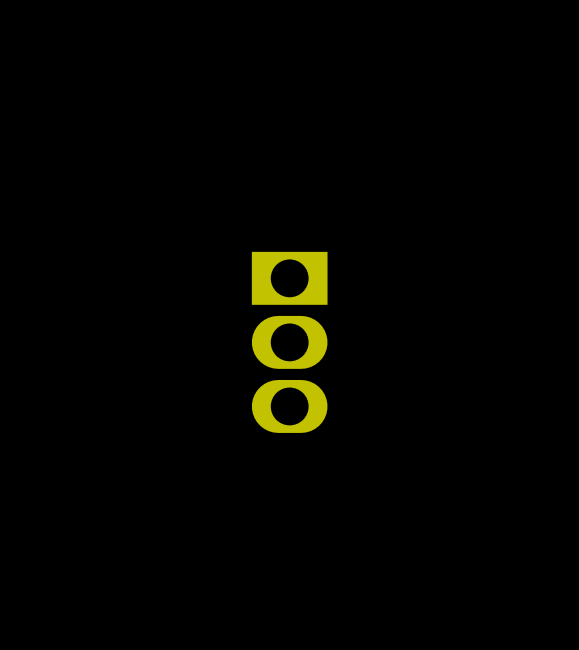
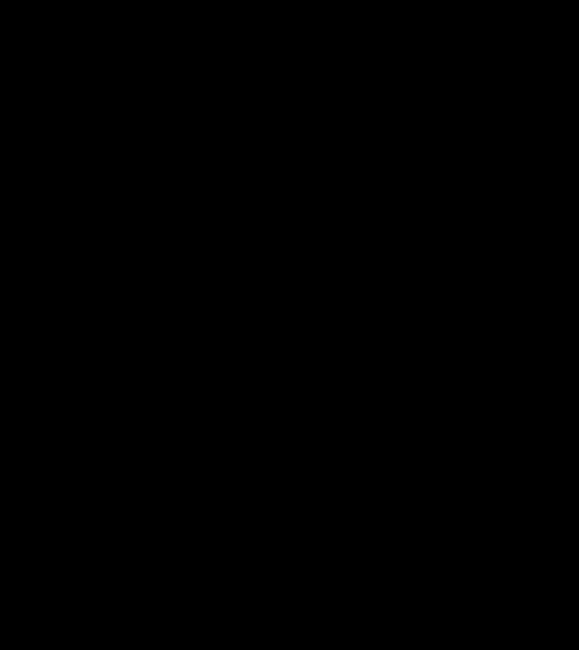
part: (289, 342) -> none

